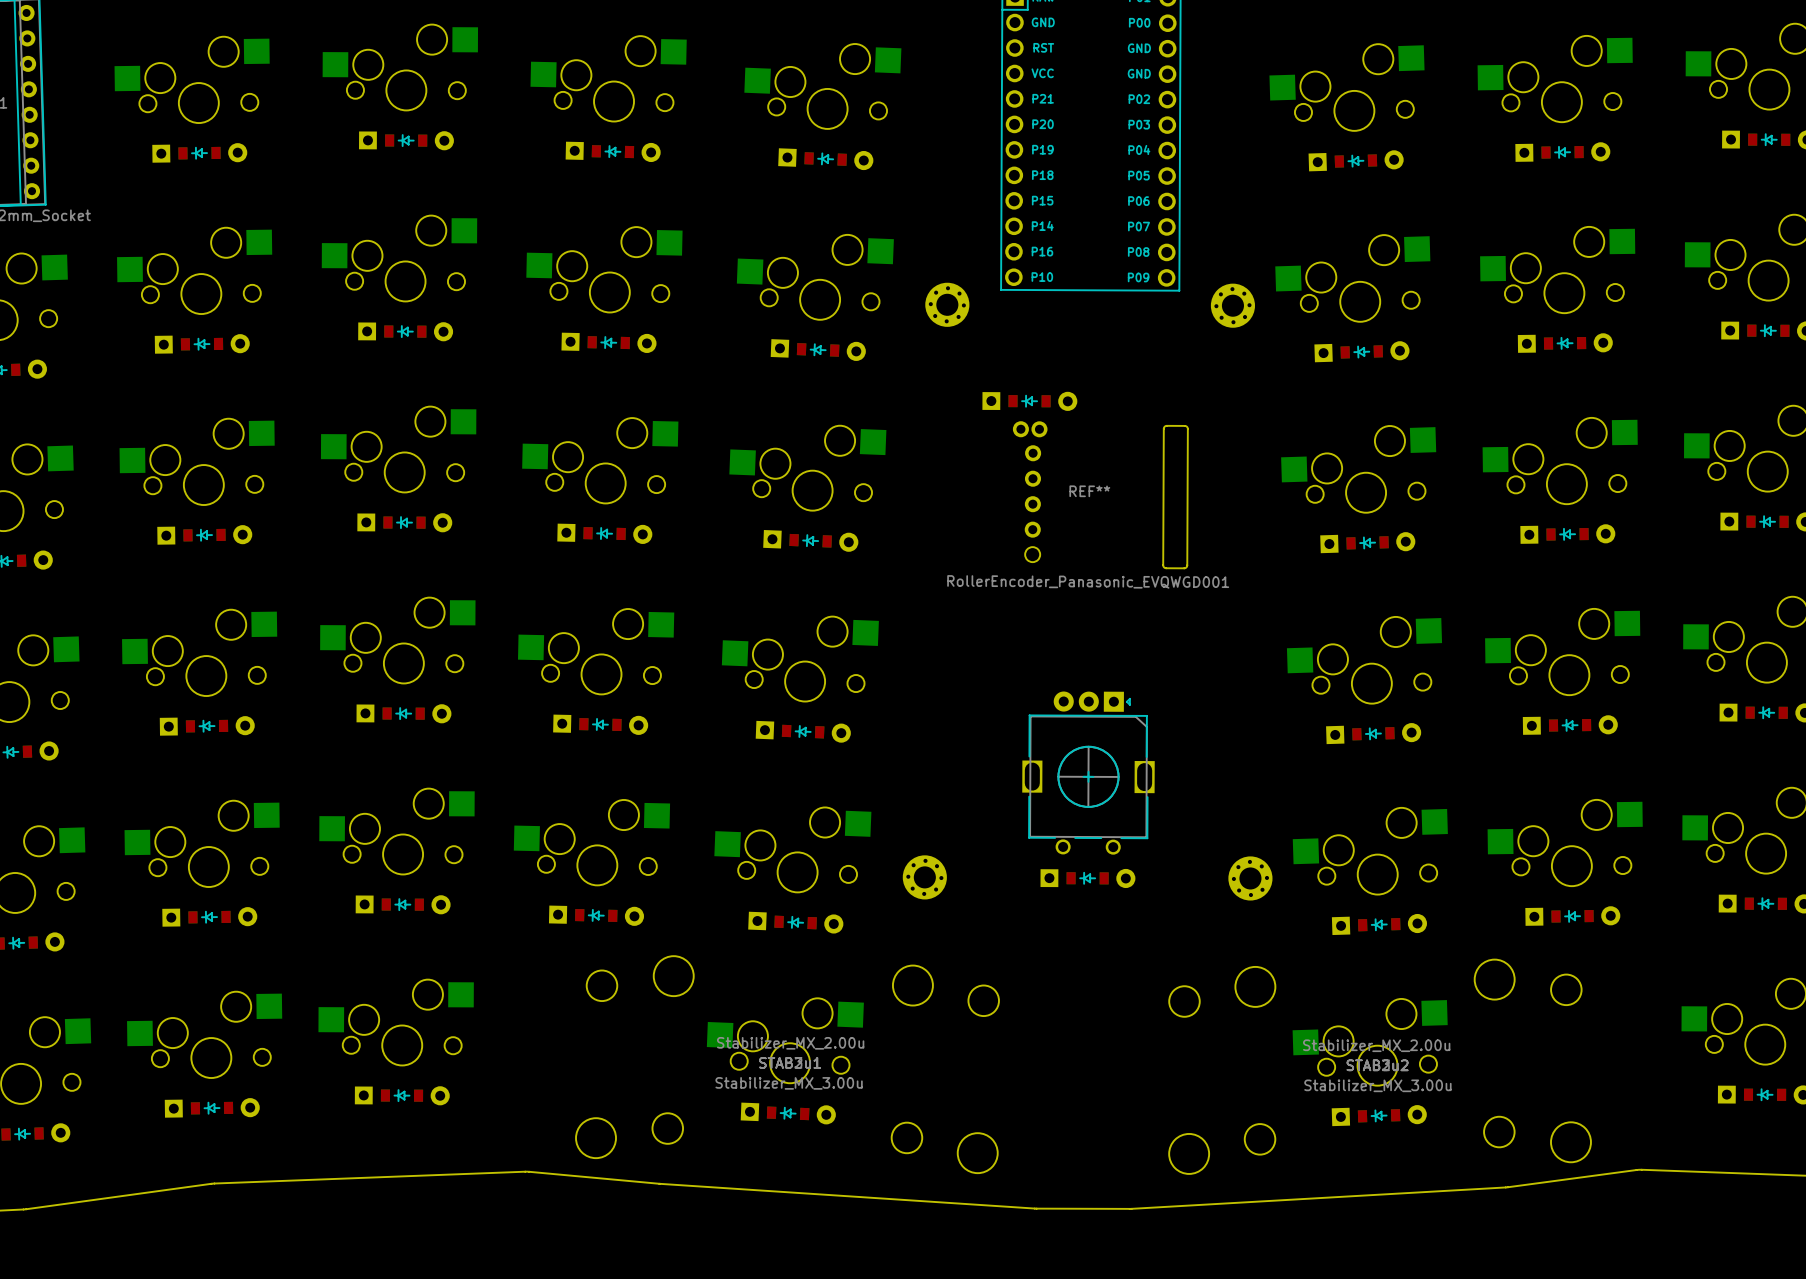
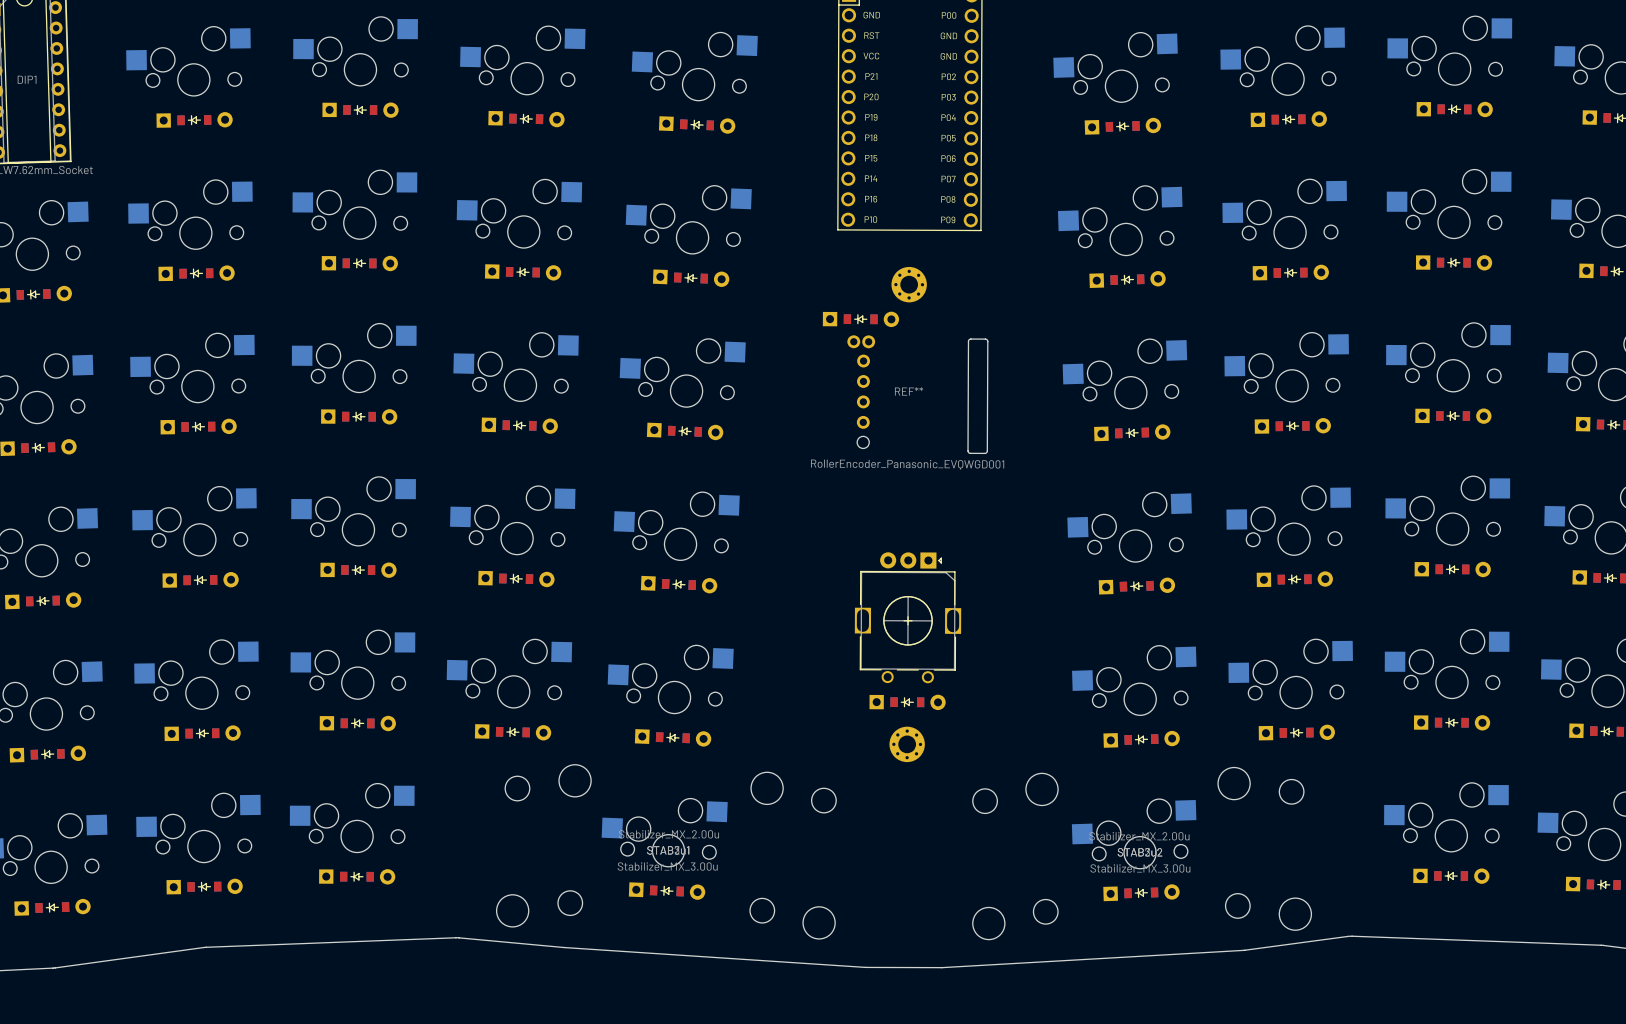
part: (947, 304) -> none
part: (1232, 305) -> none
part: none -> (909, 284)
part: (924, 877) -> none
part: (1250, 878) -> none
part: none -> (907, 744)

